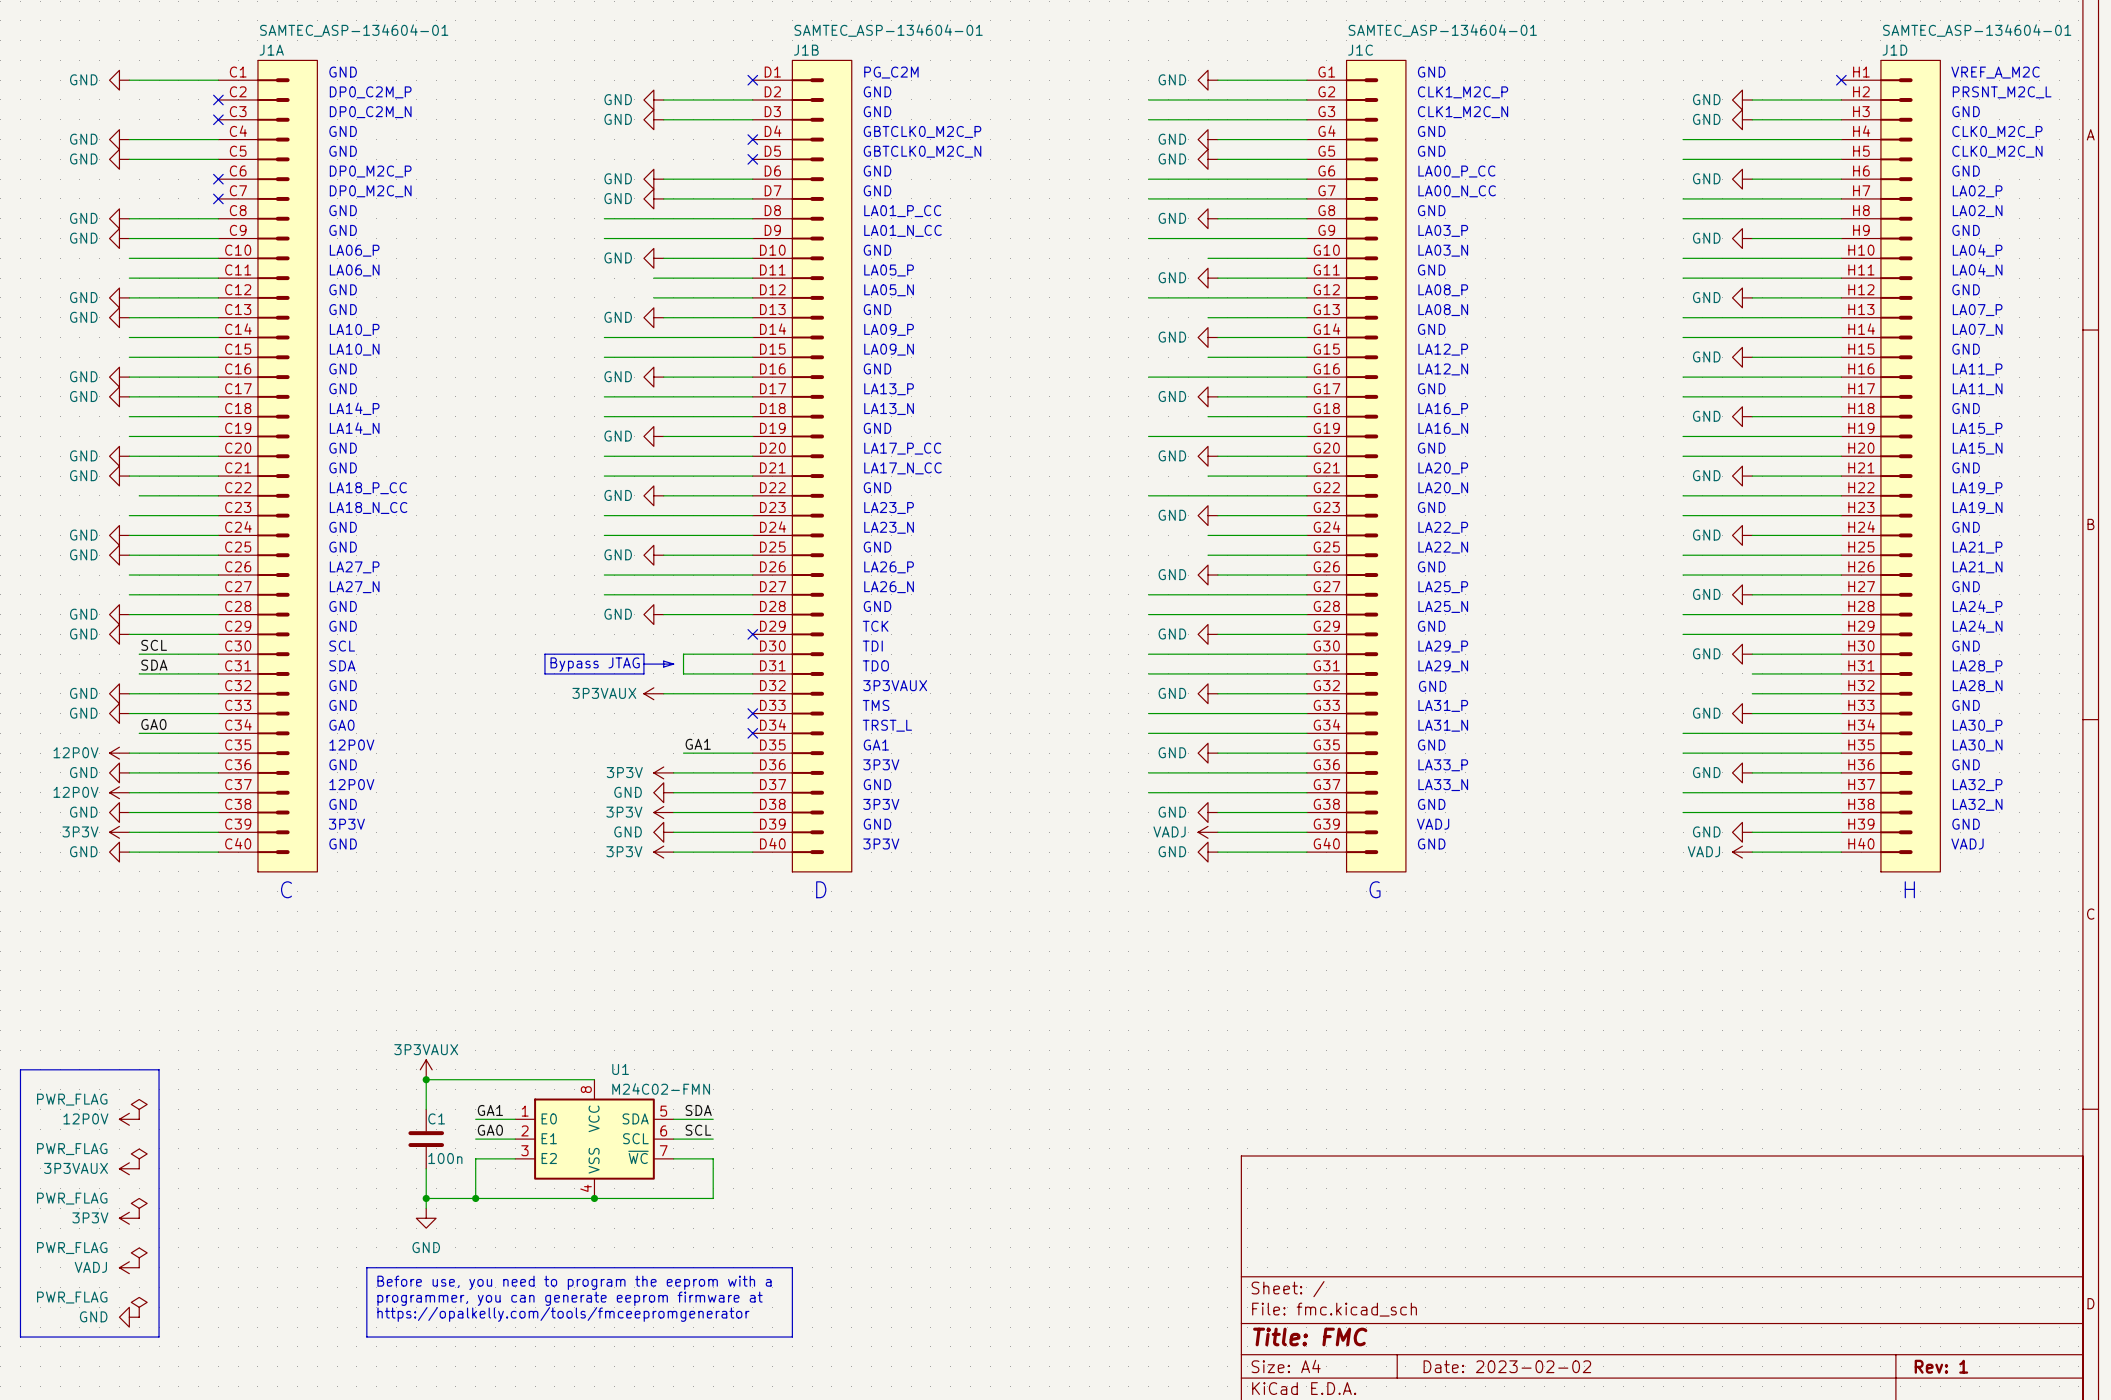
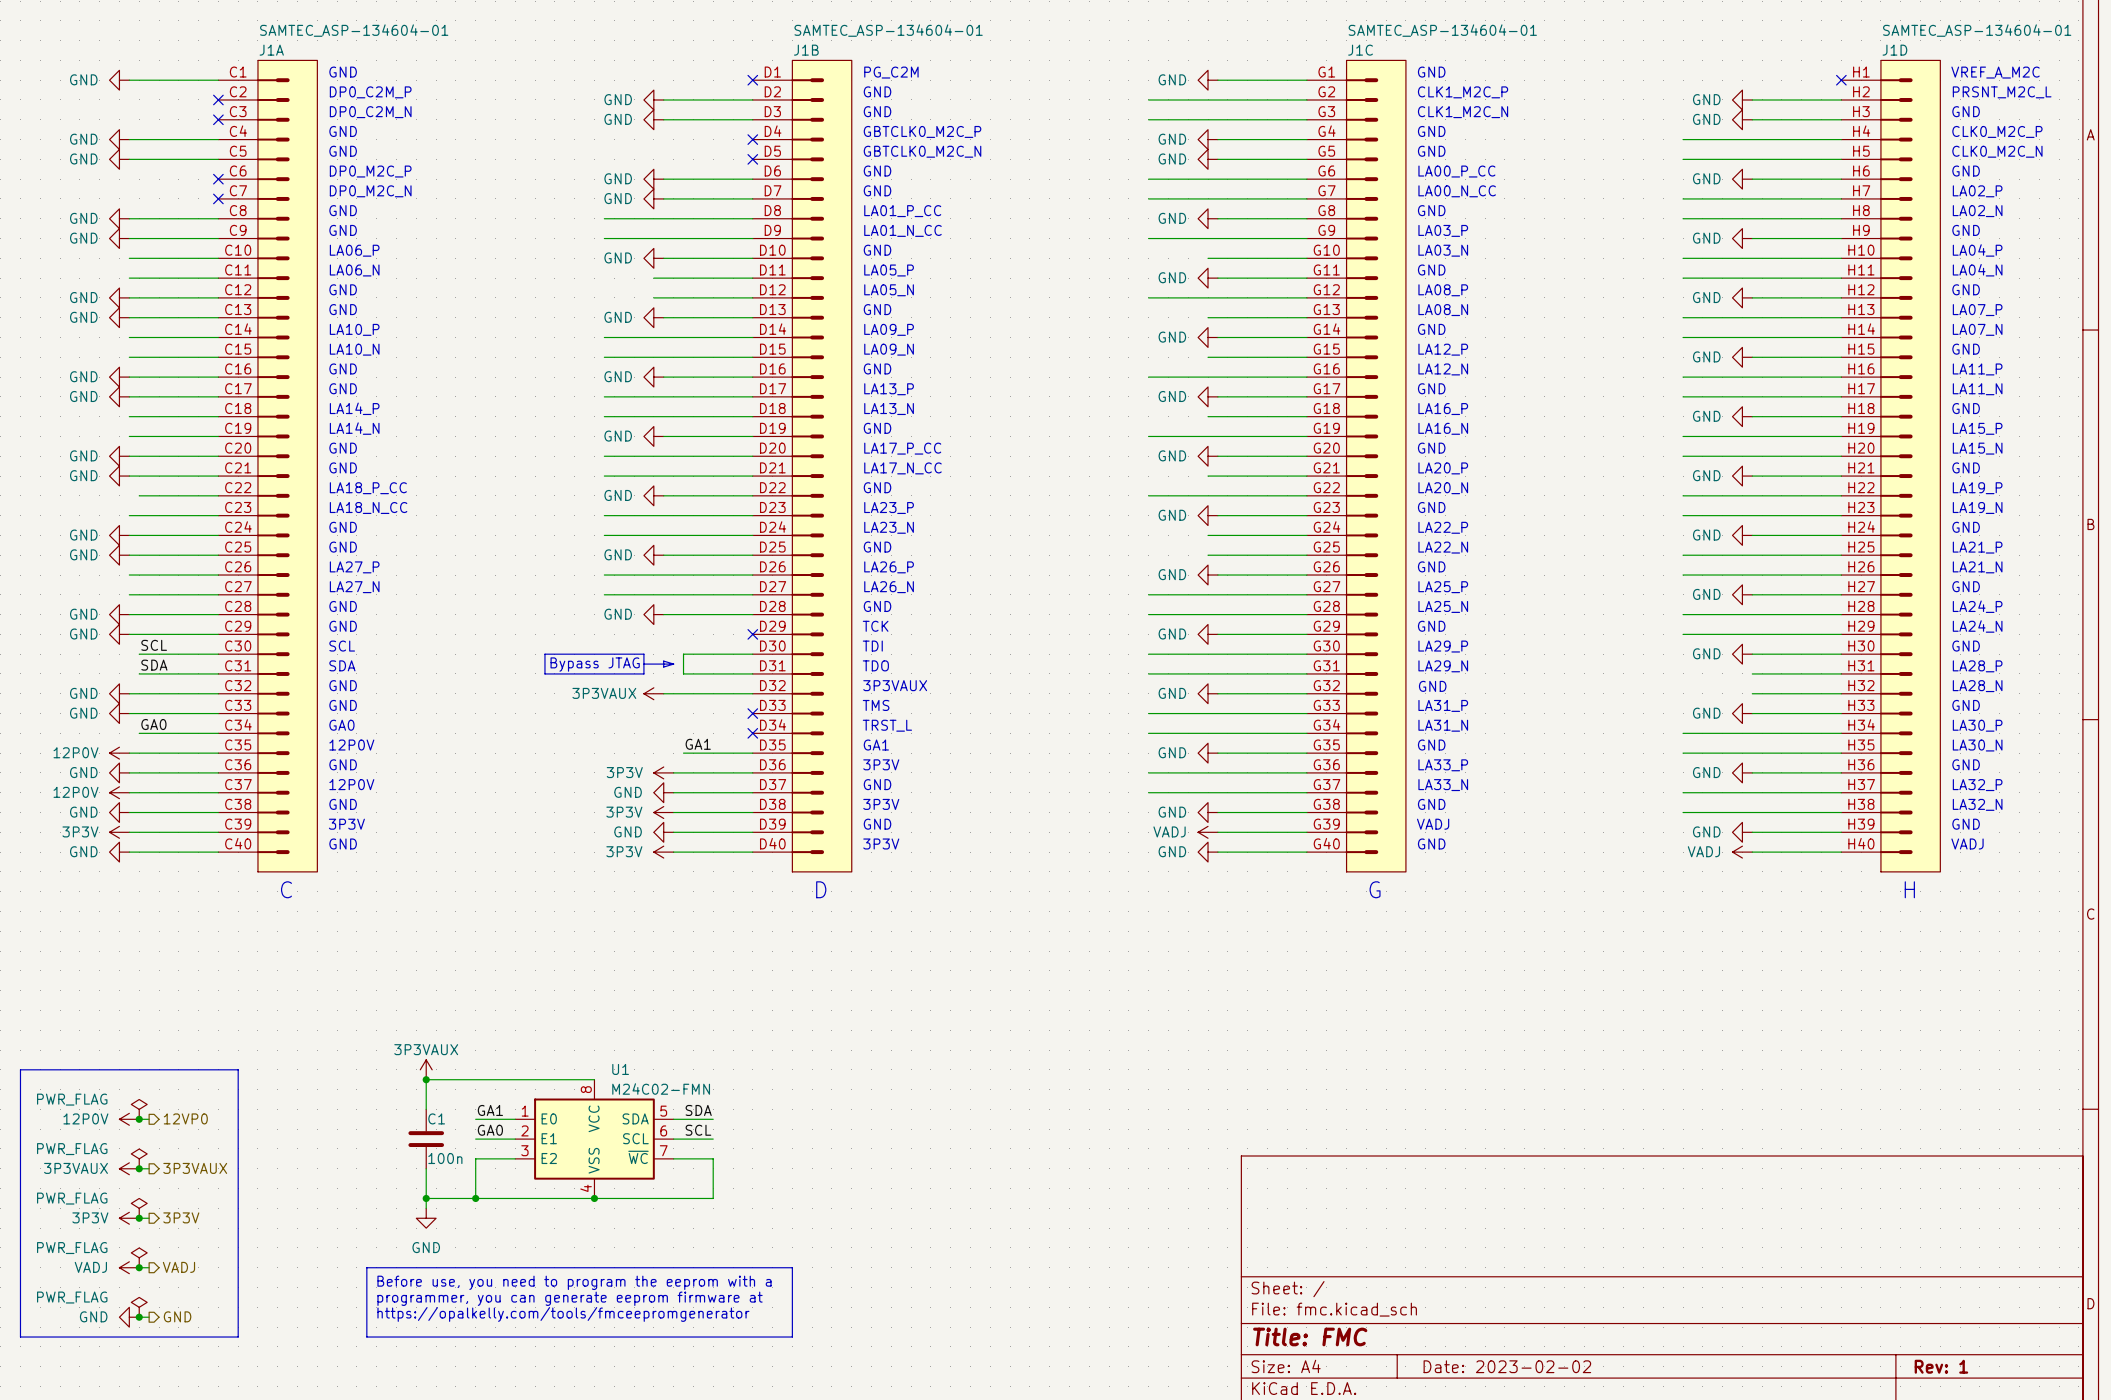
line: (159, 1069) (159, 1337) -> (159, 1069) (238, 1069) (238, 1337) (159, 1337)
hierarchical label: none -> 12VP0 (185, 1118)
wire: none -> (139, 1119) (149, 1119)
junction: none -> (139, 1119)
wire: none -> (139, 1168) (149, 1168)
junction: none -> (139, 1168)
hierarchical label: none -> 3P3VAUX (195, 1168)
hierarchical label: none -> 3P3V (181, 1217)
wire: none -> (139, 1218) (149, 1218)
junction: none -> (139, 1218)
wire: none -> (139, 1267) (149, 1267)
junction: none -> (139, 1267)
hierarchical label: none -> VADJ (178, 1267)
hierarchical label: none -> GND (177, 1316)
wire: none -> (139, 1317) (149, 1317)
junction: none -> (139, 1317)

